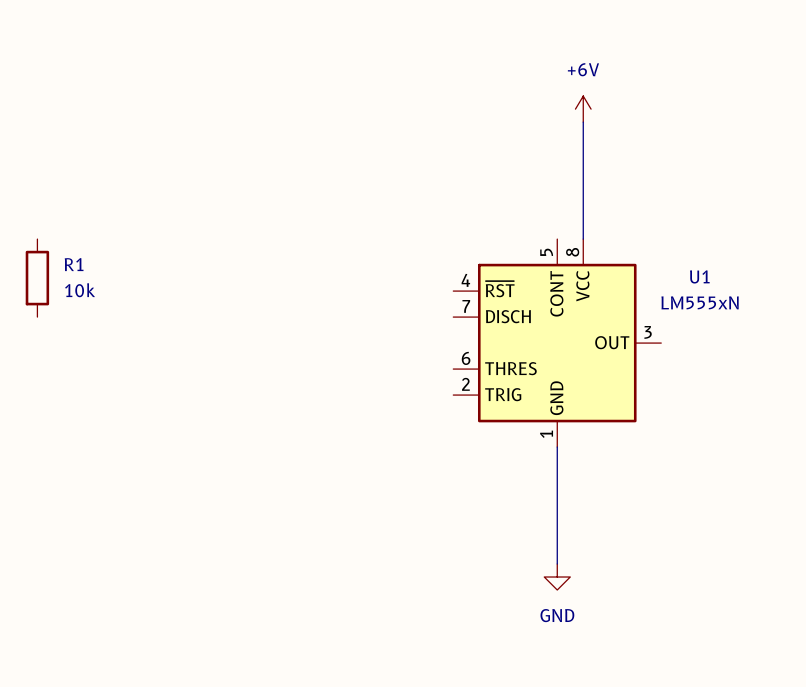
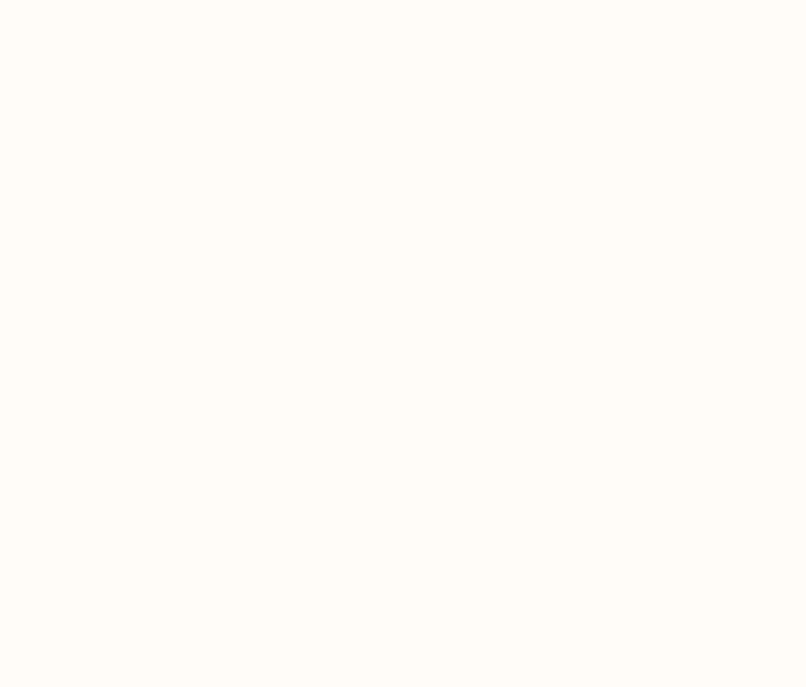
power symbol: +6V (583, 109) -> none
wire: (583, 122) (583, 239) -> none
R1: 10k (37, 278) -> none
U1: LM555xN (557, 343) -> none
wire: (557, 447) (557, 564) -> none
power symbol: GND (557, 577) -> none

